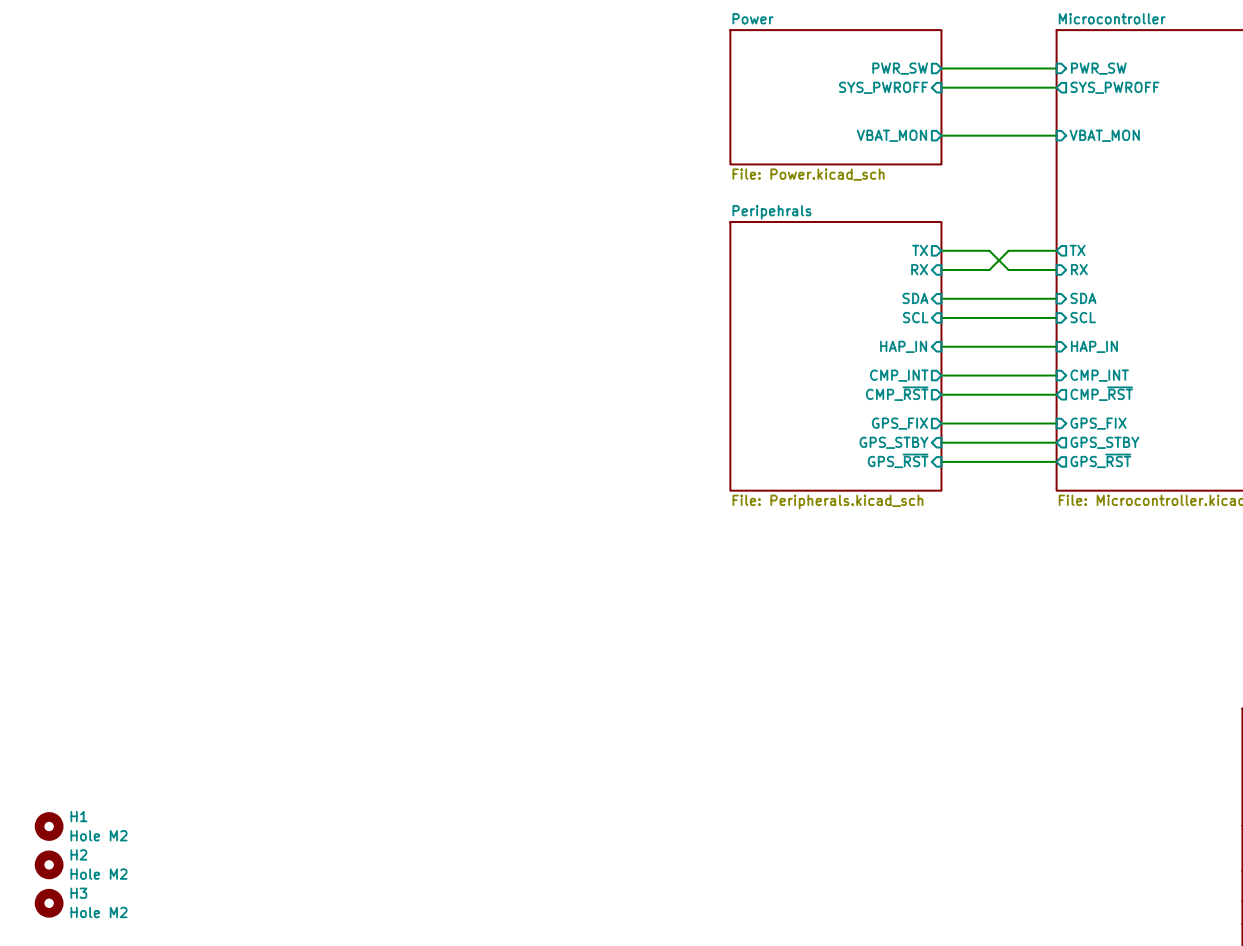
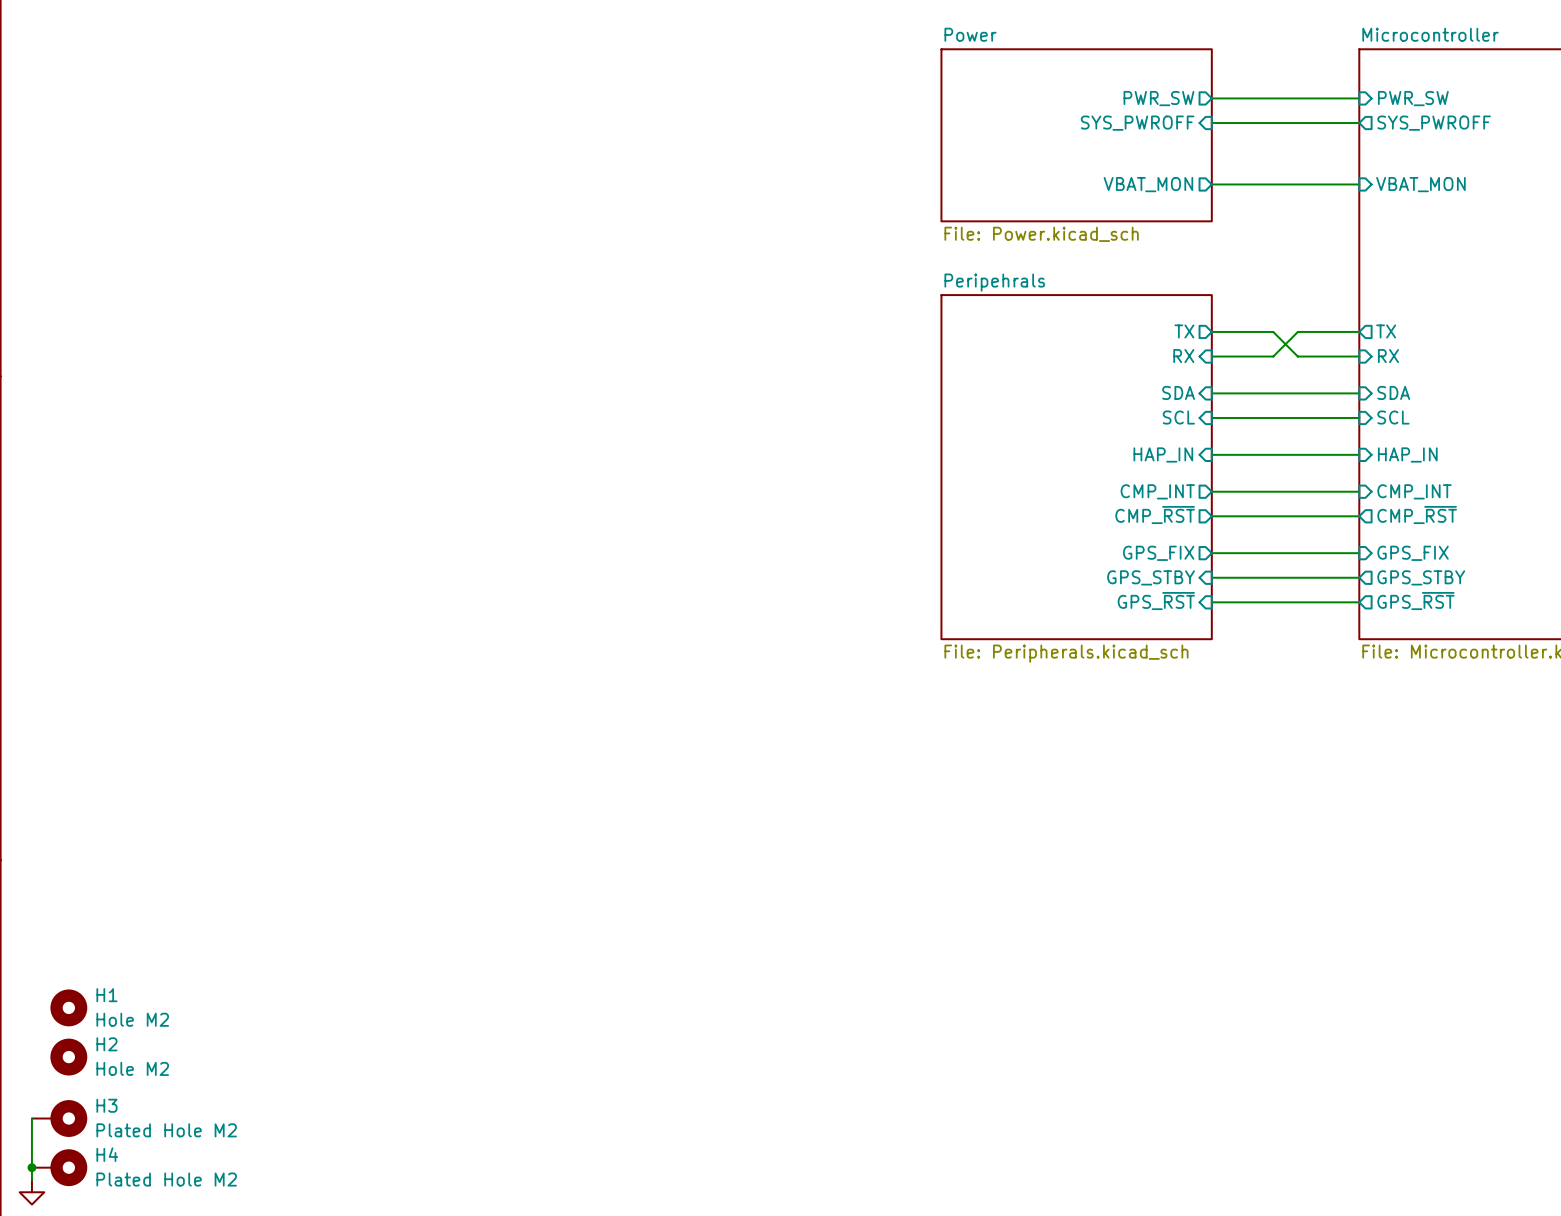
H1 position: (49, 826) -> (68, 1007)
wire: none -> (31, 1118) (31, 1179)
H2 position: (49, 864) -> (68, 1057)
H3 symbol: [34, 888, 64, 918] -> [31, 1100, 88, 1137]
junction: none -> (31, 1167)
H4: none -> Plated Hole M2 (59, 1167)
H3 value: Hole M2 (99, 912) -> Plated Hole M2 (166, 1130)
power symbol: none -> (31, 1192)

